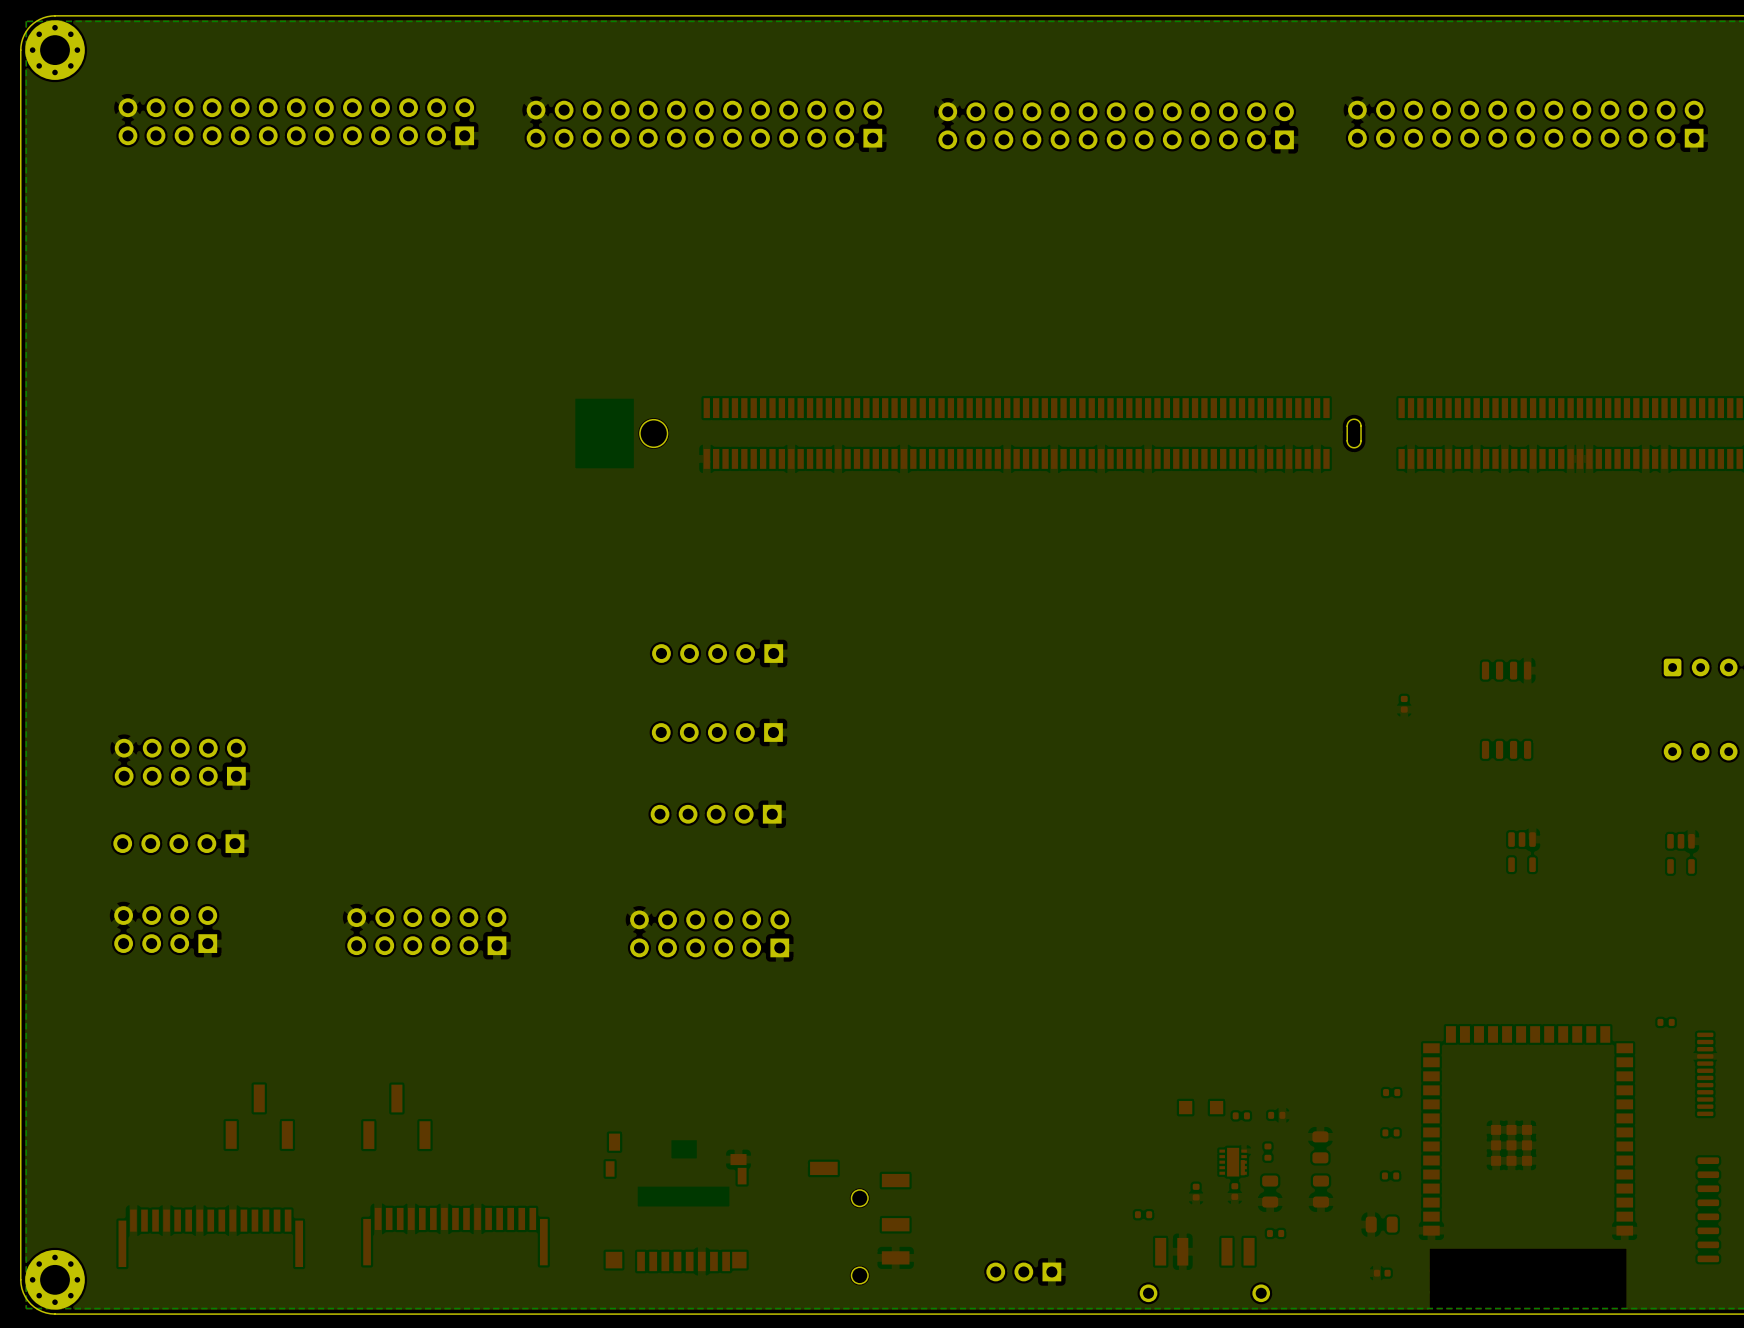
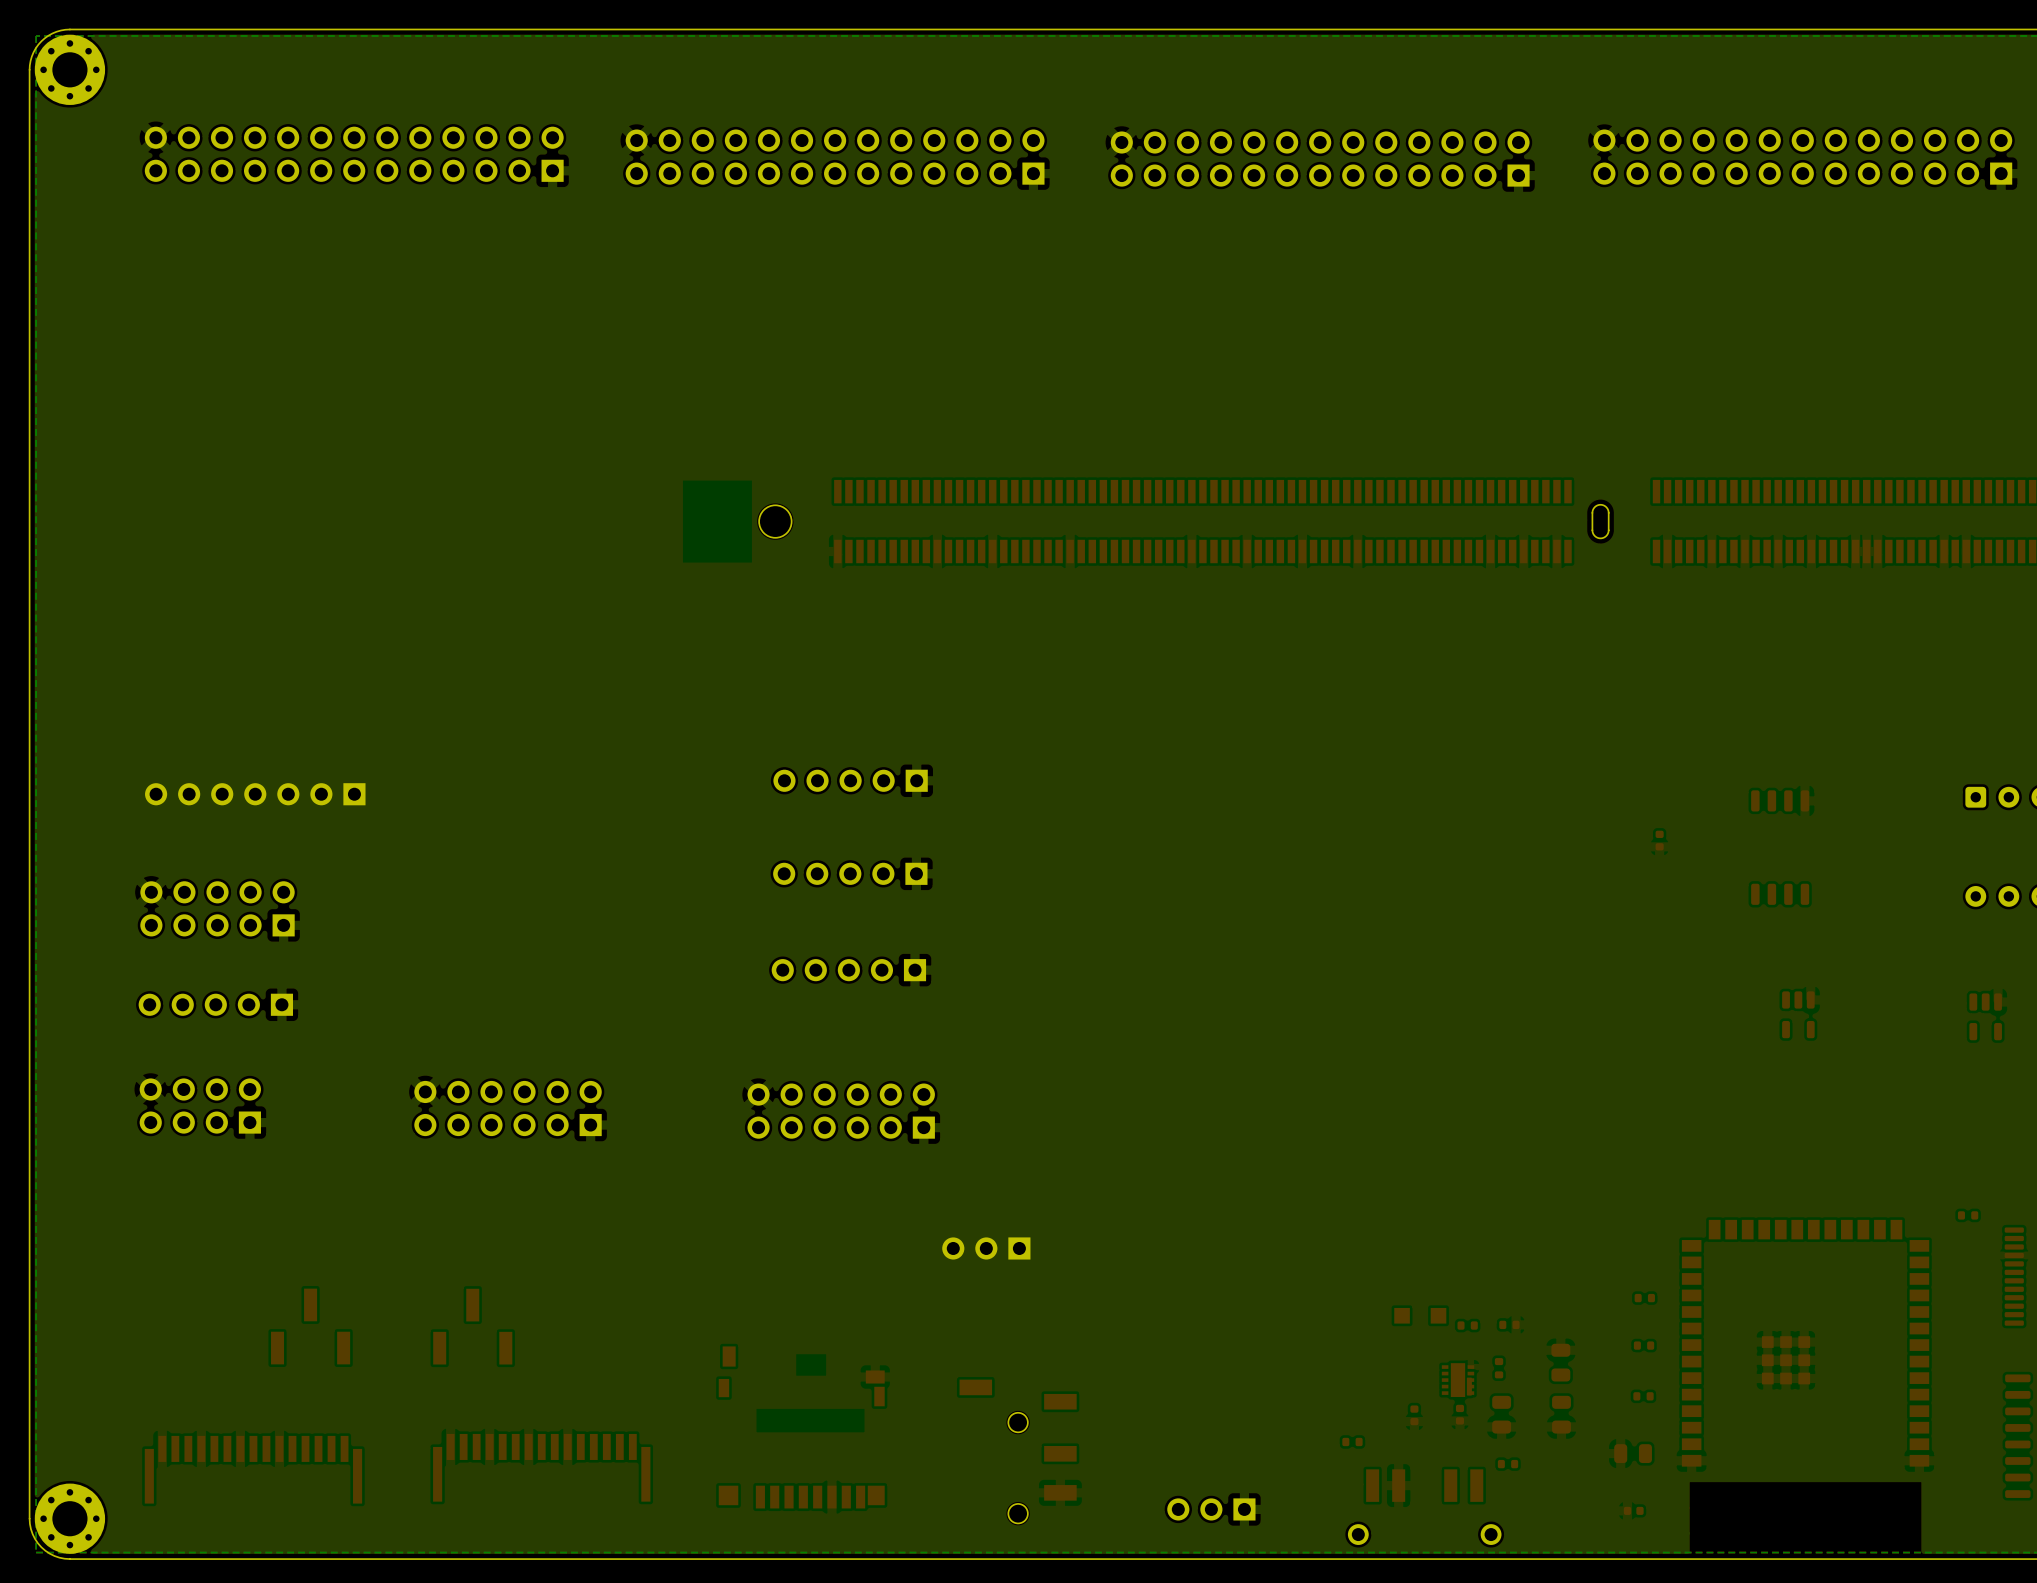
part: none -> (255, 794)
part: none -> (986, 1248)

